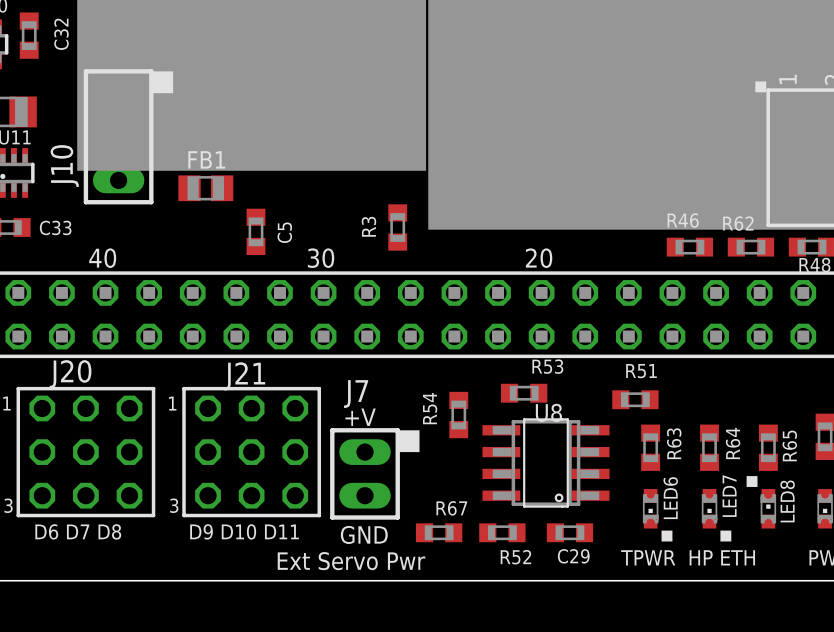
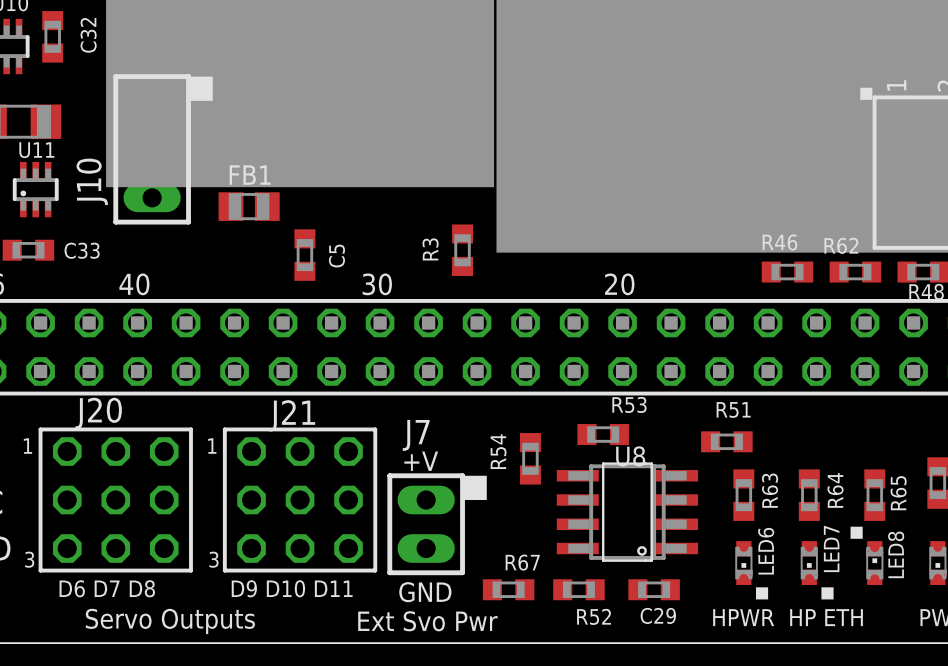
text: TPWR HP ETH (688, 557) -> HPWR HP ETH (788, 617)
text: none -> Servo Outputs (170, 621)
text: Ext Servo Pwr (351, 561) -> Ext Svo Pwr (427, 621)

